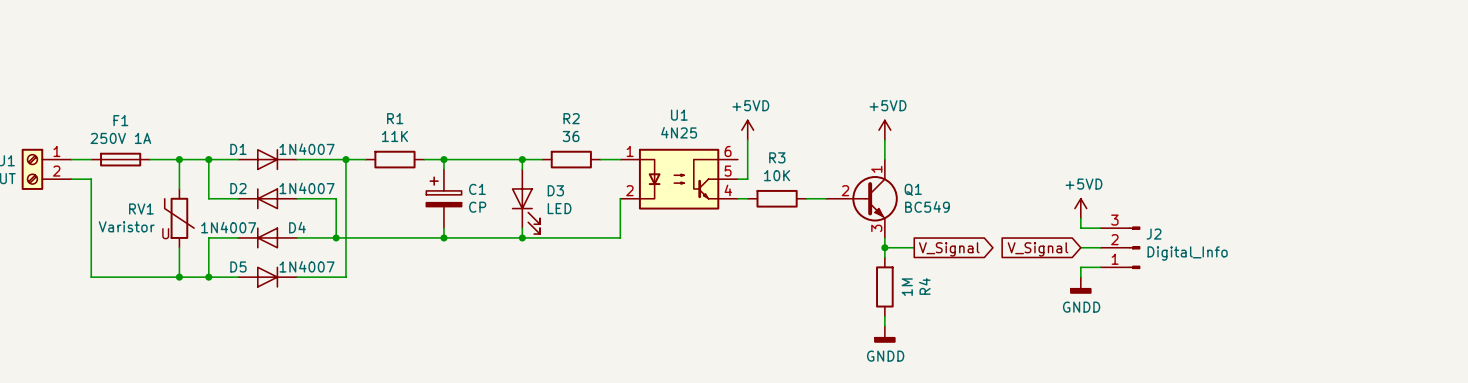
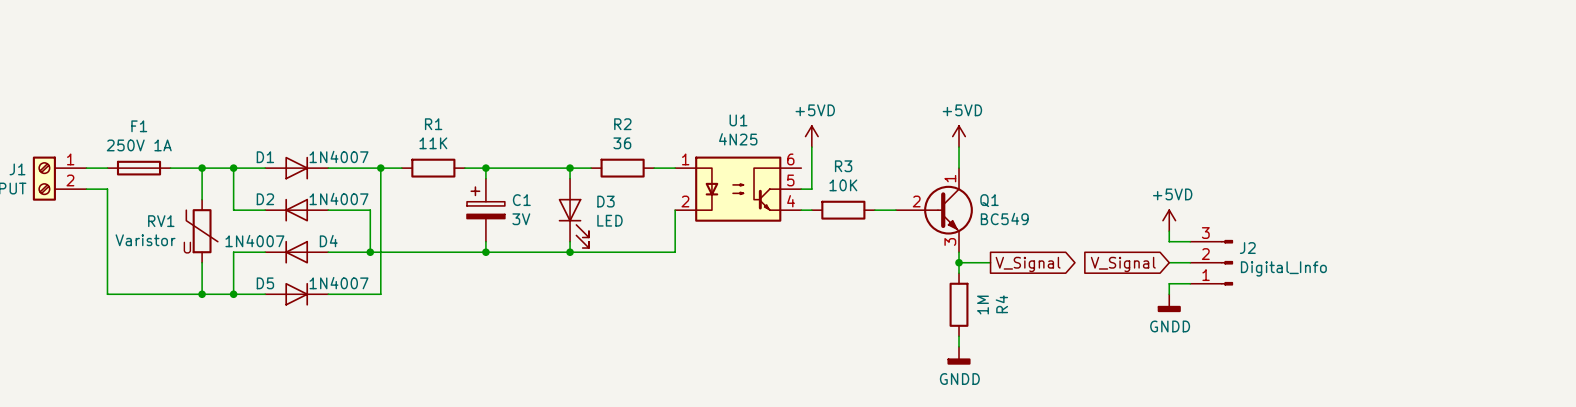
C1 value: CP (477, 207) -> 3V (521, 219)

